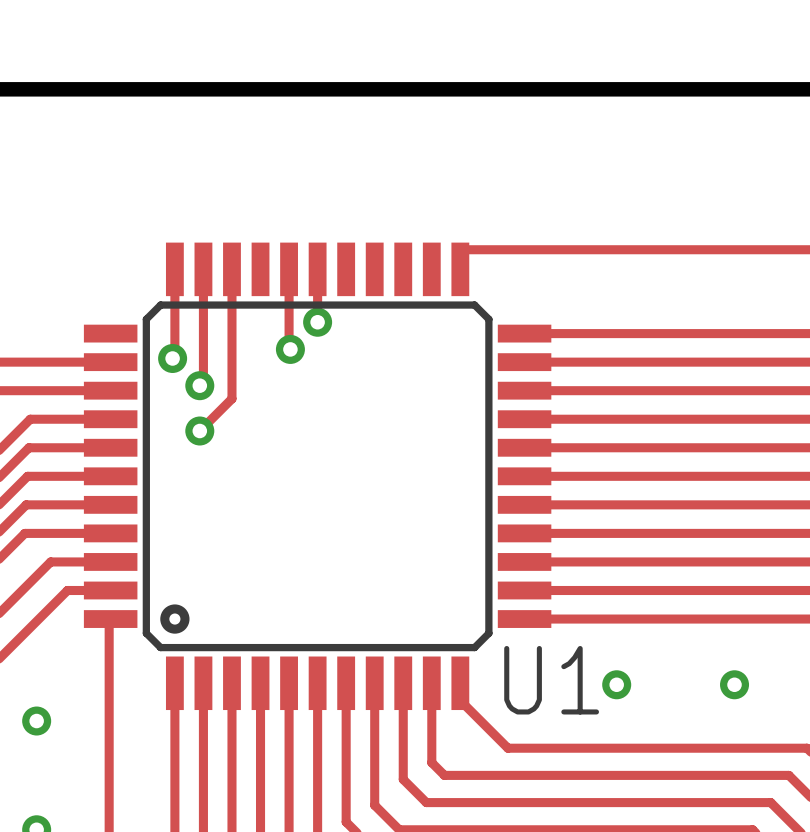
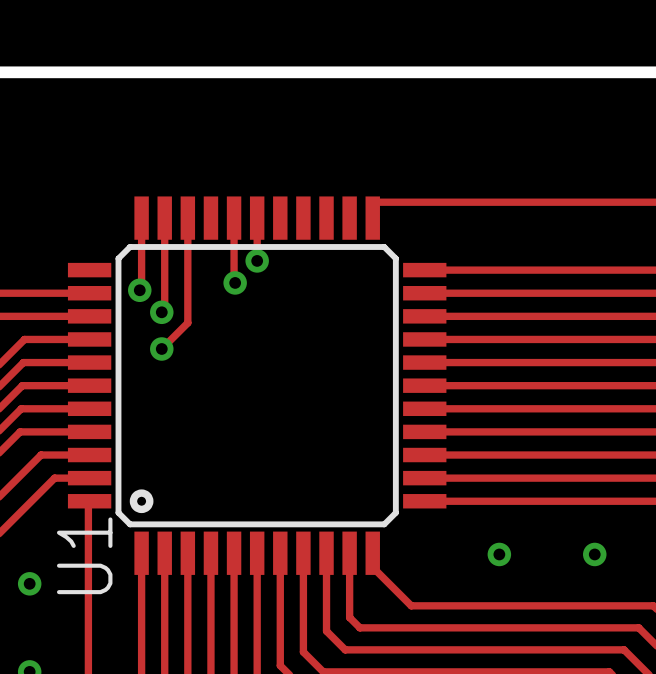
U1 name rotation: 0° (551, 680) -> 90° counterclockwise (84, 555)
U1 name position: U1 (551, 680) -> U1 (84, 555)

